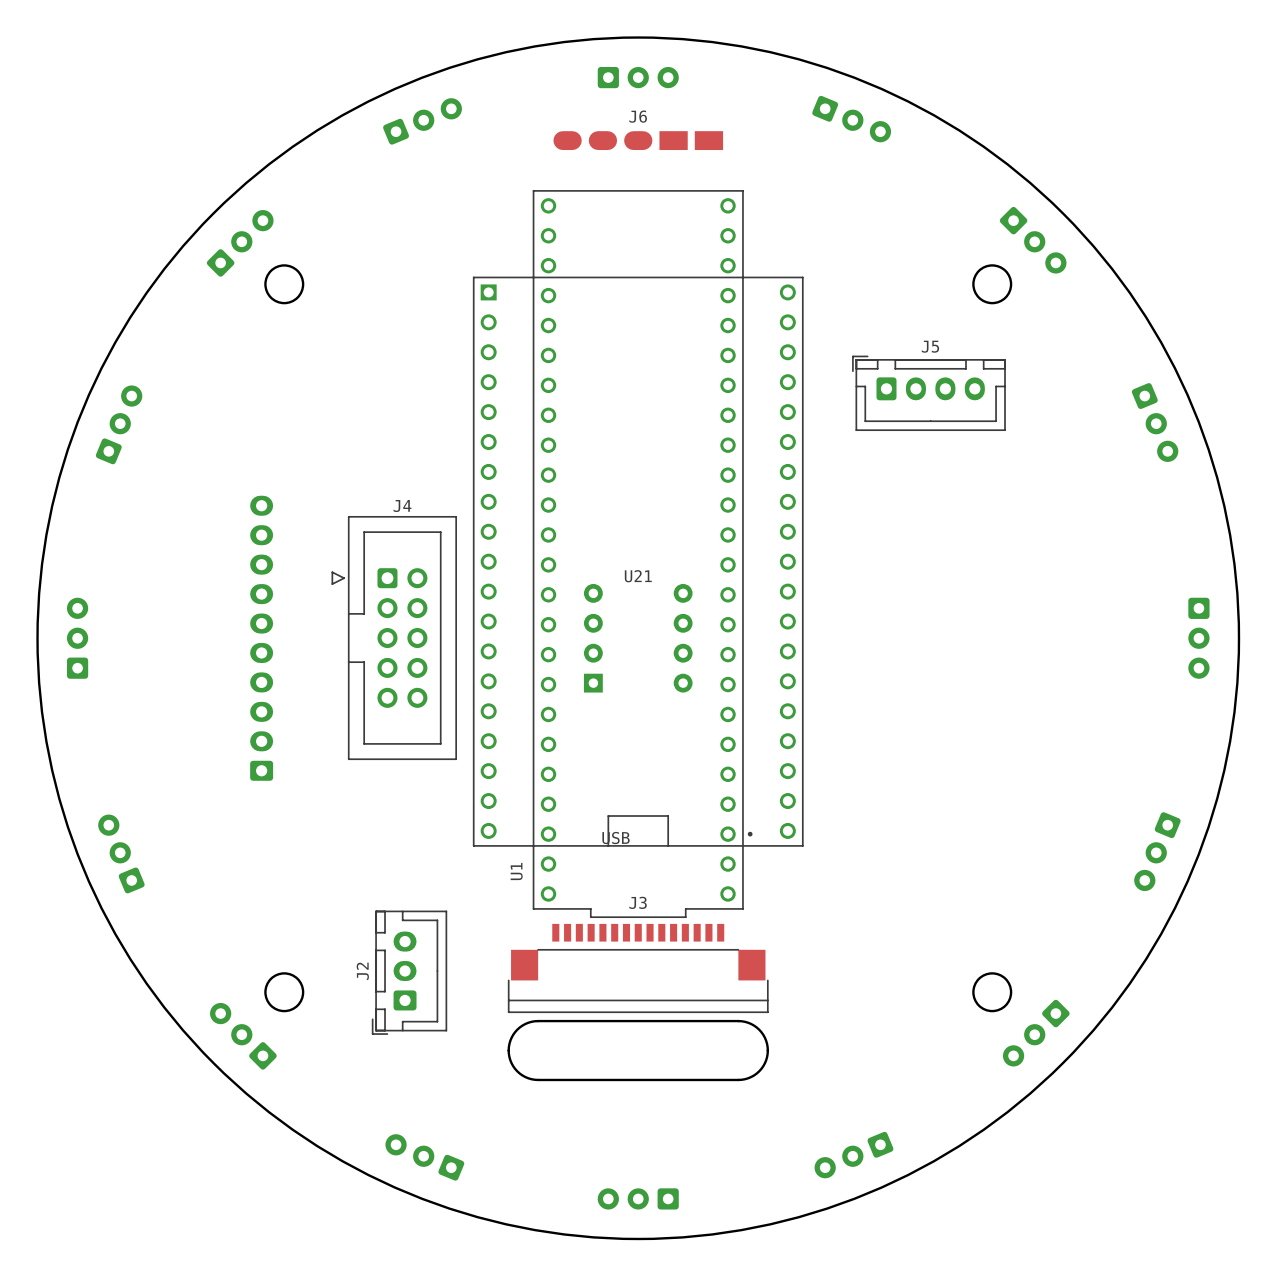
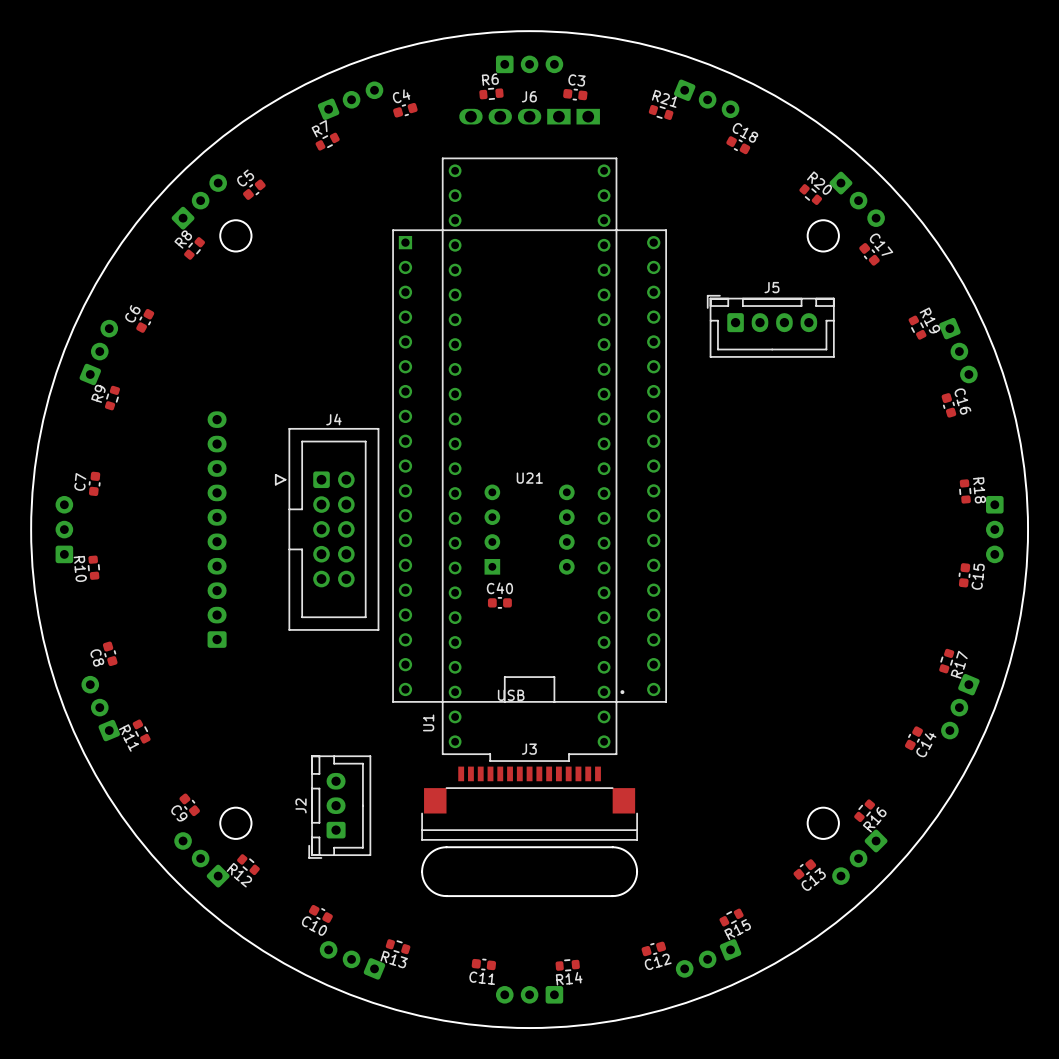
R6: none -> (491, 93)
C3: none -> (575, 94)
J6 footprint: [553, 131, 724, 151] -> [459, 108, 600, 125]
C4: none -> (405, 110)
R21: none -> (661, 112)
R7: none -> (327, 141)
C18: none -> (738, 145)
C5: none -> (254, 189)
R20: none -> (810, 194)
R8: none -> (194, 248)
C17: none -> (869, 254)
C6: none -> (145, 320)
R19: none -> (917, 327)
R9: none -> (112, 398)
C16: none -> (948, 405)
C7: none -> (94, 483)
R18: none -> (965, 491)
R10: none -> (93, 567)
C15: none -> (964, 575)
C40: none -> (499, 602)
C8: none -> (110, 653)
R17: none -> (946, 661)
R11: none -> (141, 731)
C14: none -> (913, 738)
C9: none -> (189, 804)
R16: none -> (864, 810)
R12: none -> (248, 864)
C13: none -> (804, 869)
C10: none -> (320, 913)
R15: none -> (731, 917)
R13: none -> (398, 946)
C12: none -> (653, 948)
C11: none -> (483, 964)
R14: none -> (567, 965)

